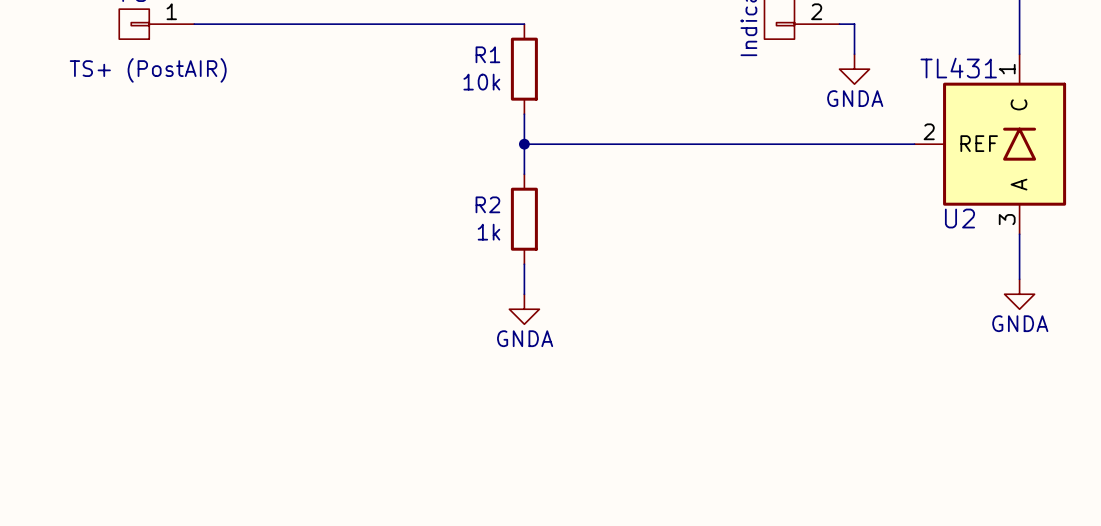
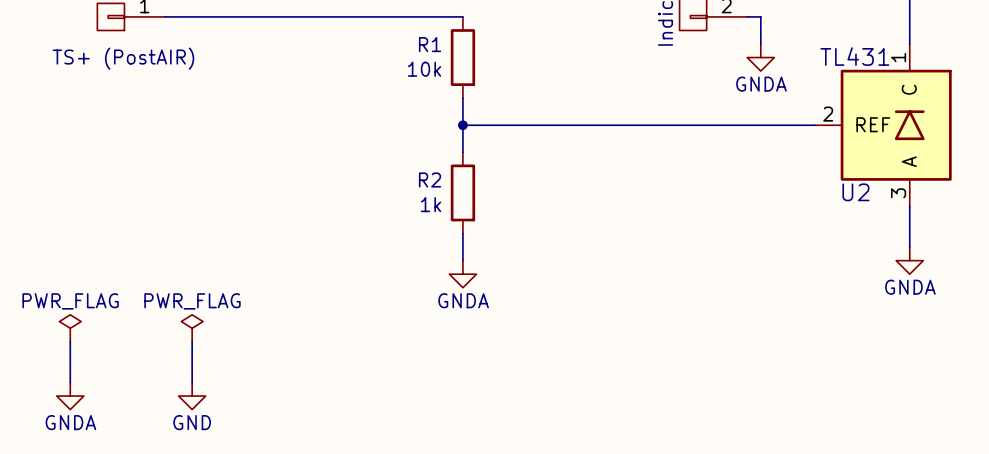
power symbol: none -> PWR_FLAG (70, 328)
power symbol: none -> PWR_FLAG (192, 328)
wire: none -> (70, 341) (70, 382)
wire: none -> (192, 341) (192, 382)
power symbol: none -> GNDA (70, 396)
power symbol: none -> GND (192, 396)

